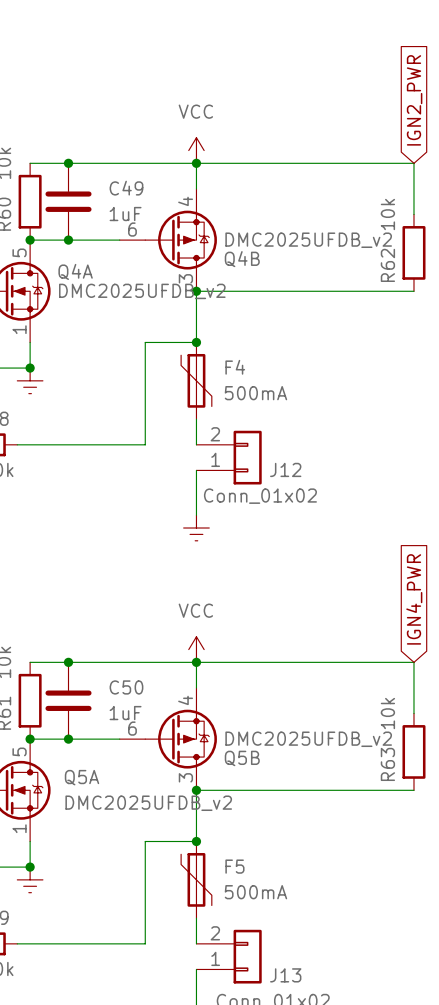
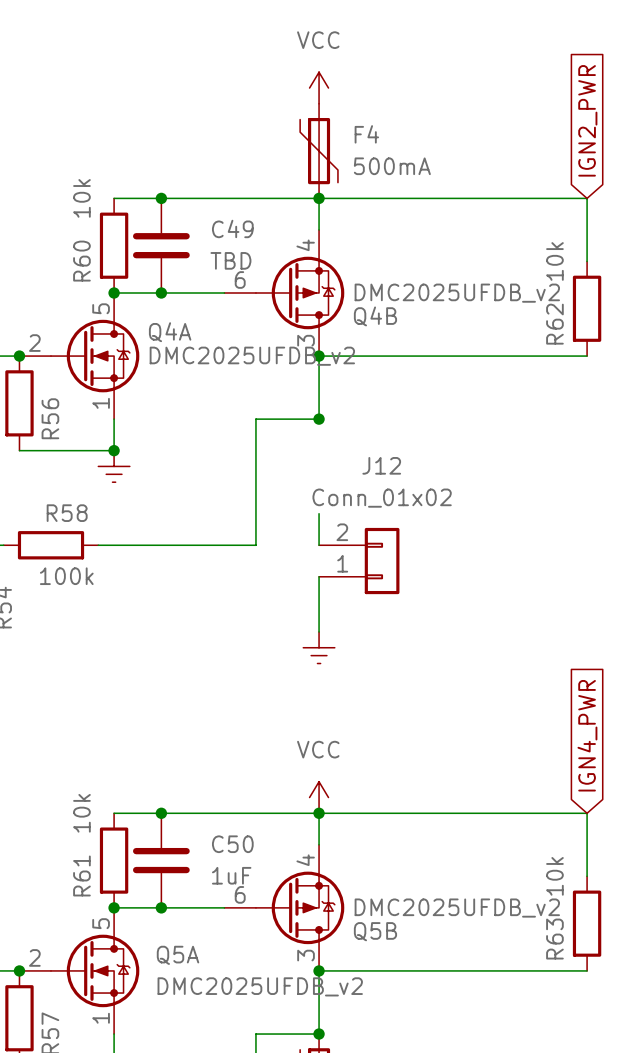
power symbol position: VCC (196, 150) -> VCC (319, 88)
C49 value: 1uF (125, 214) -> TBD (230, 260)
F4 position: (196, 380) -> (319, 151)
J12 name position: J12 (285, 469) -> J12 (381, 465)
J12 value position: Conn_01x02 (260, 496) -> Conn_01x02 (382, 498)

